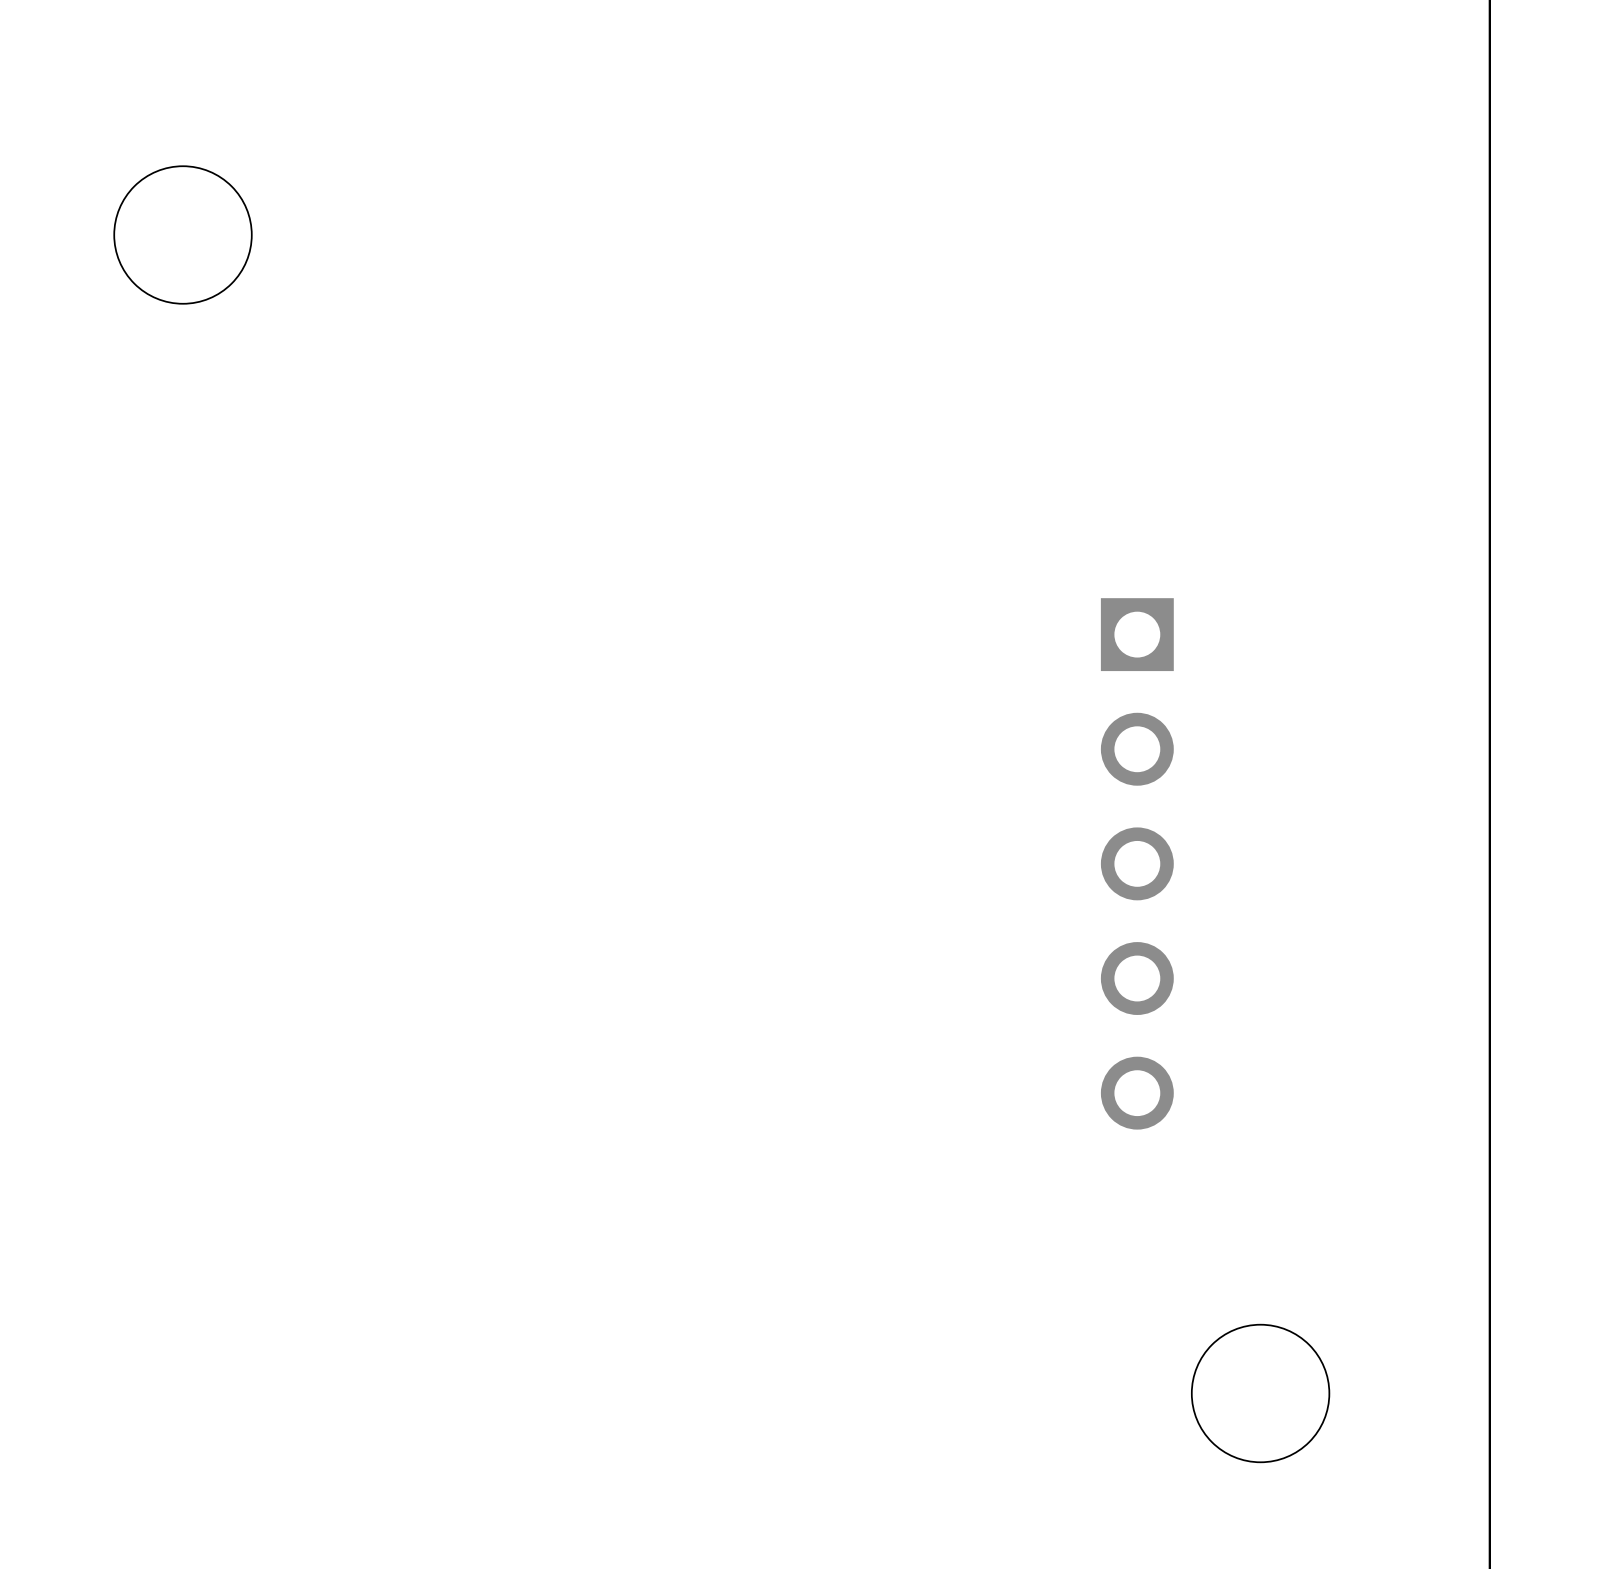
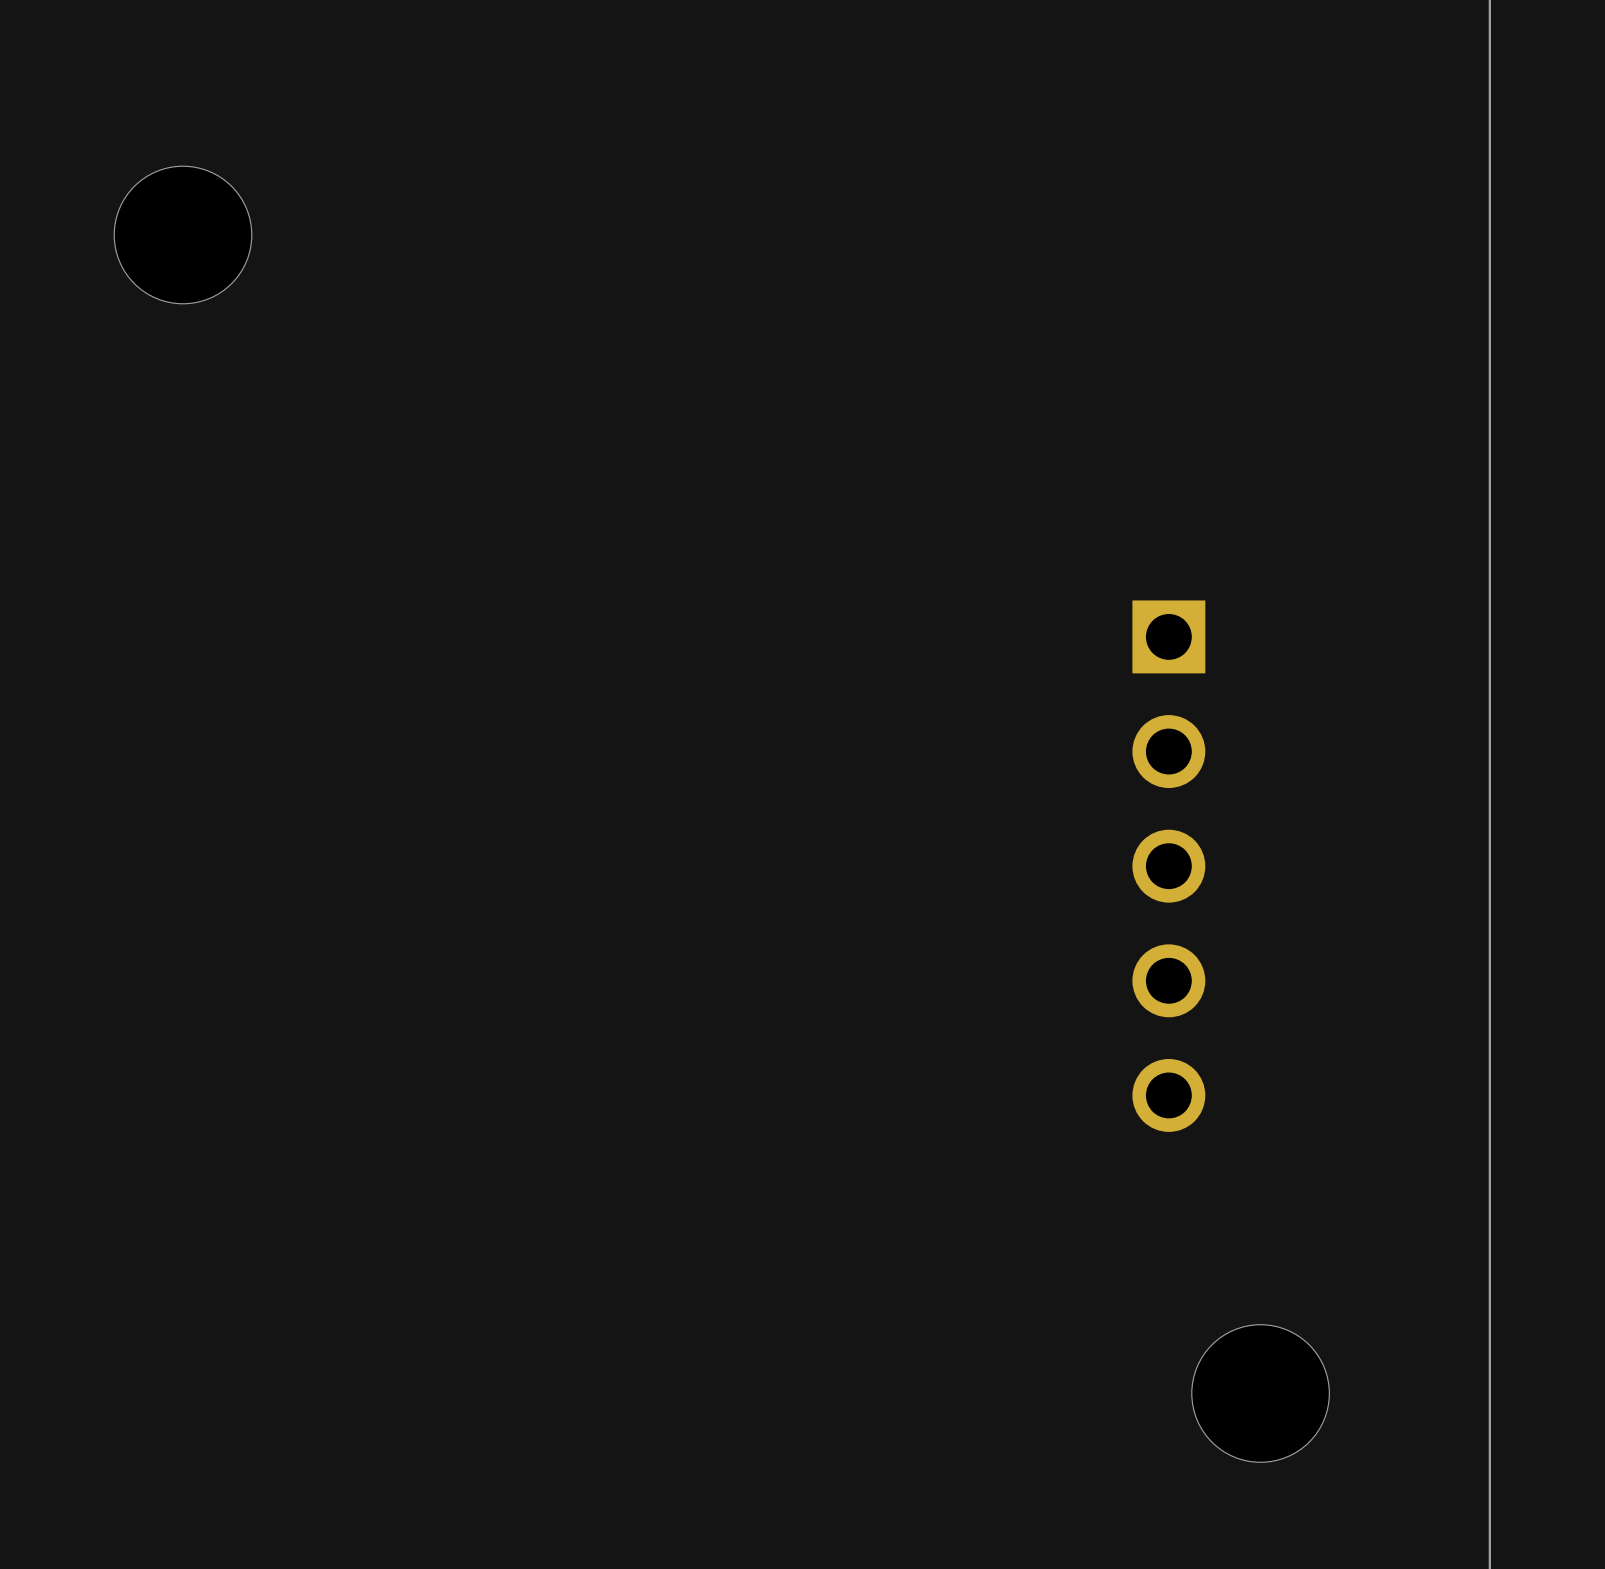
part position: (1137, 863) -> (1168, 866)

